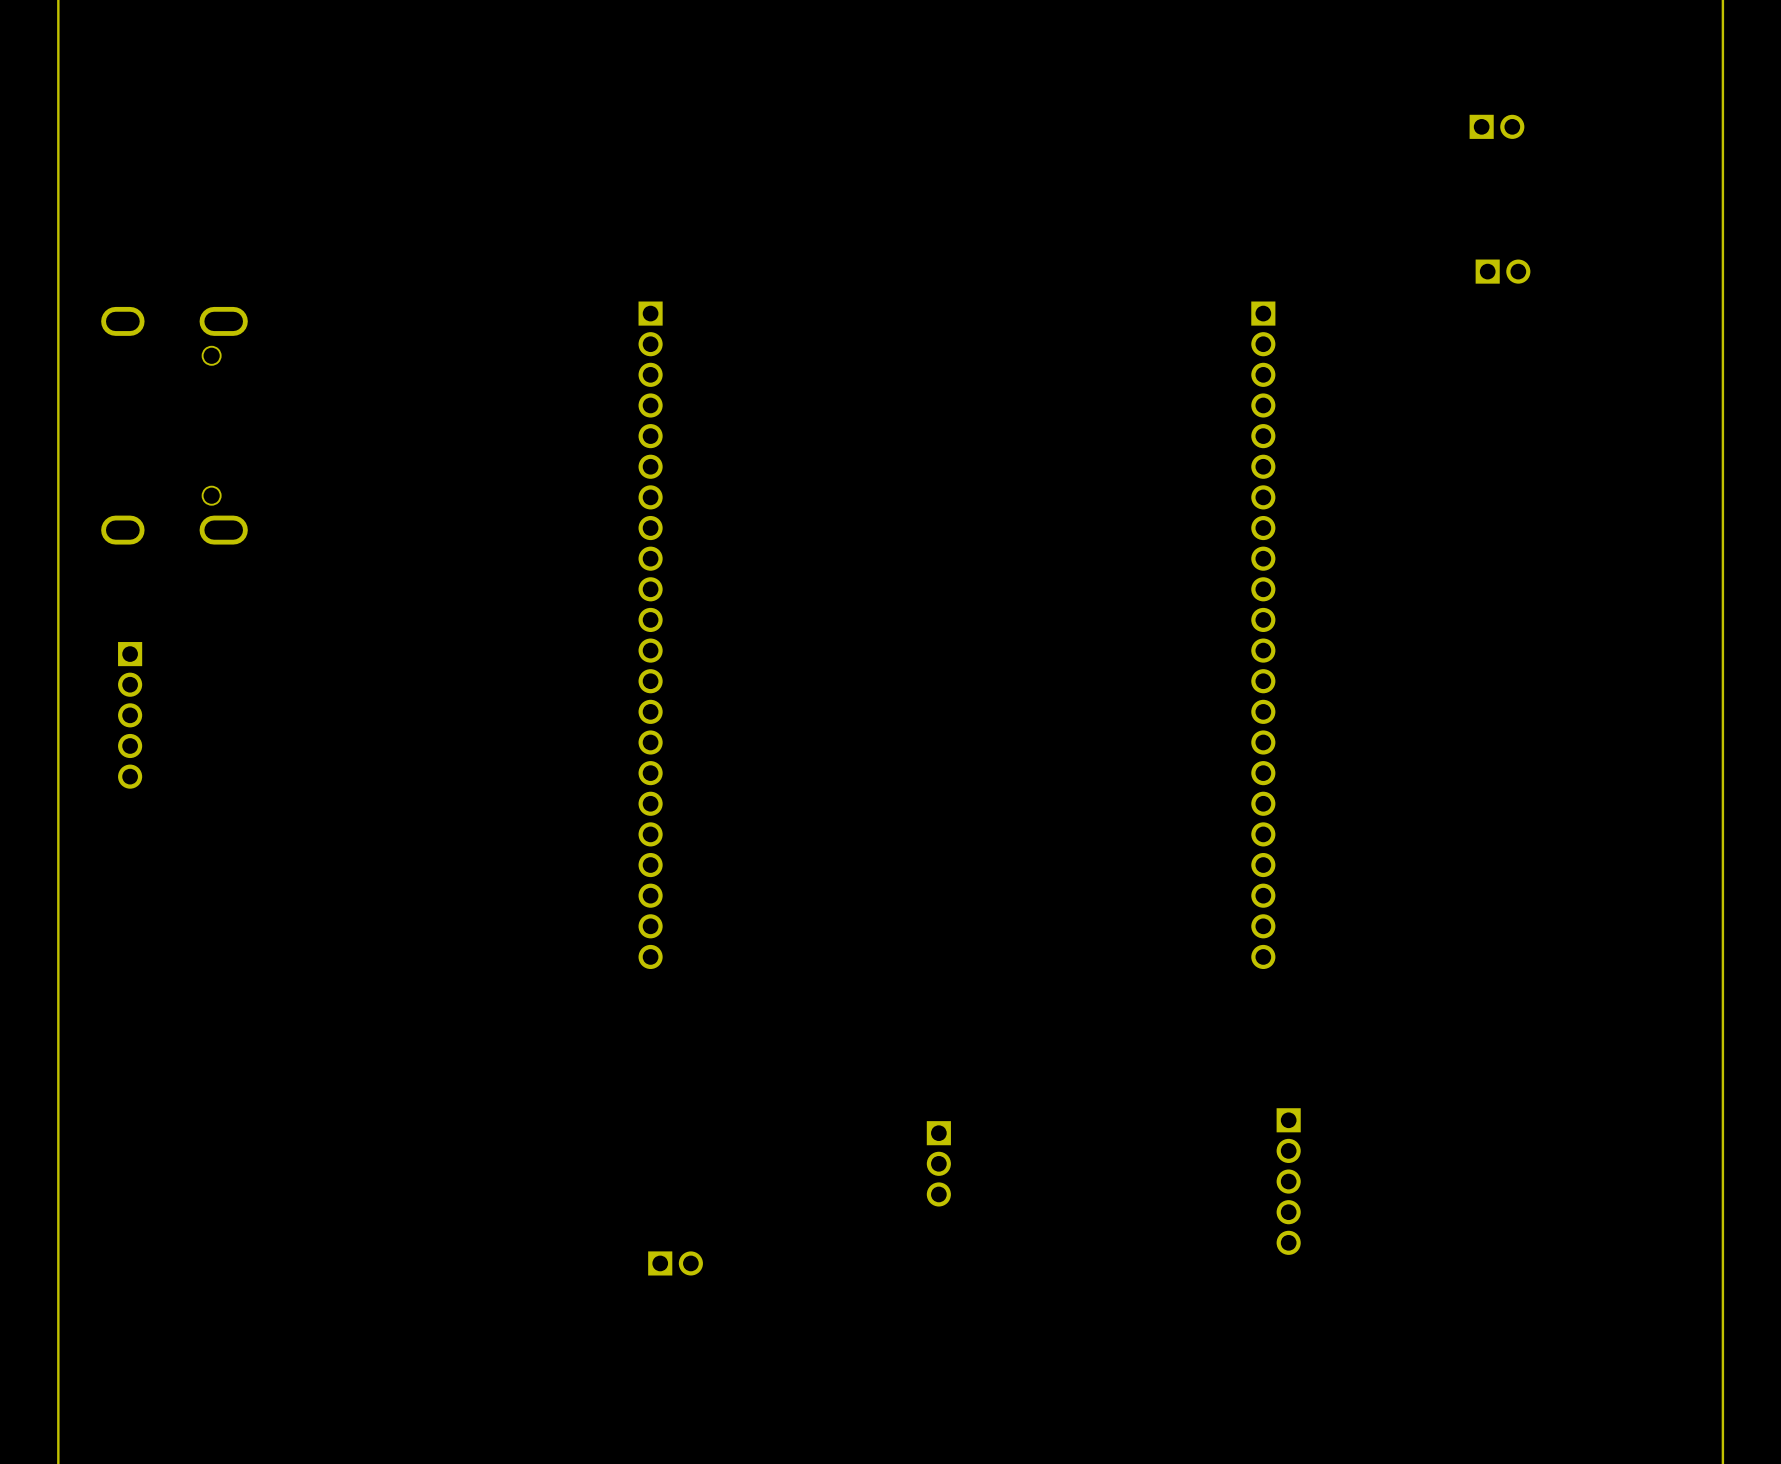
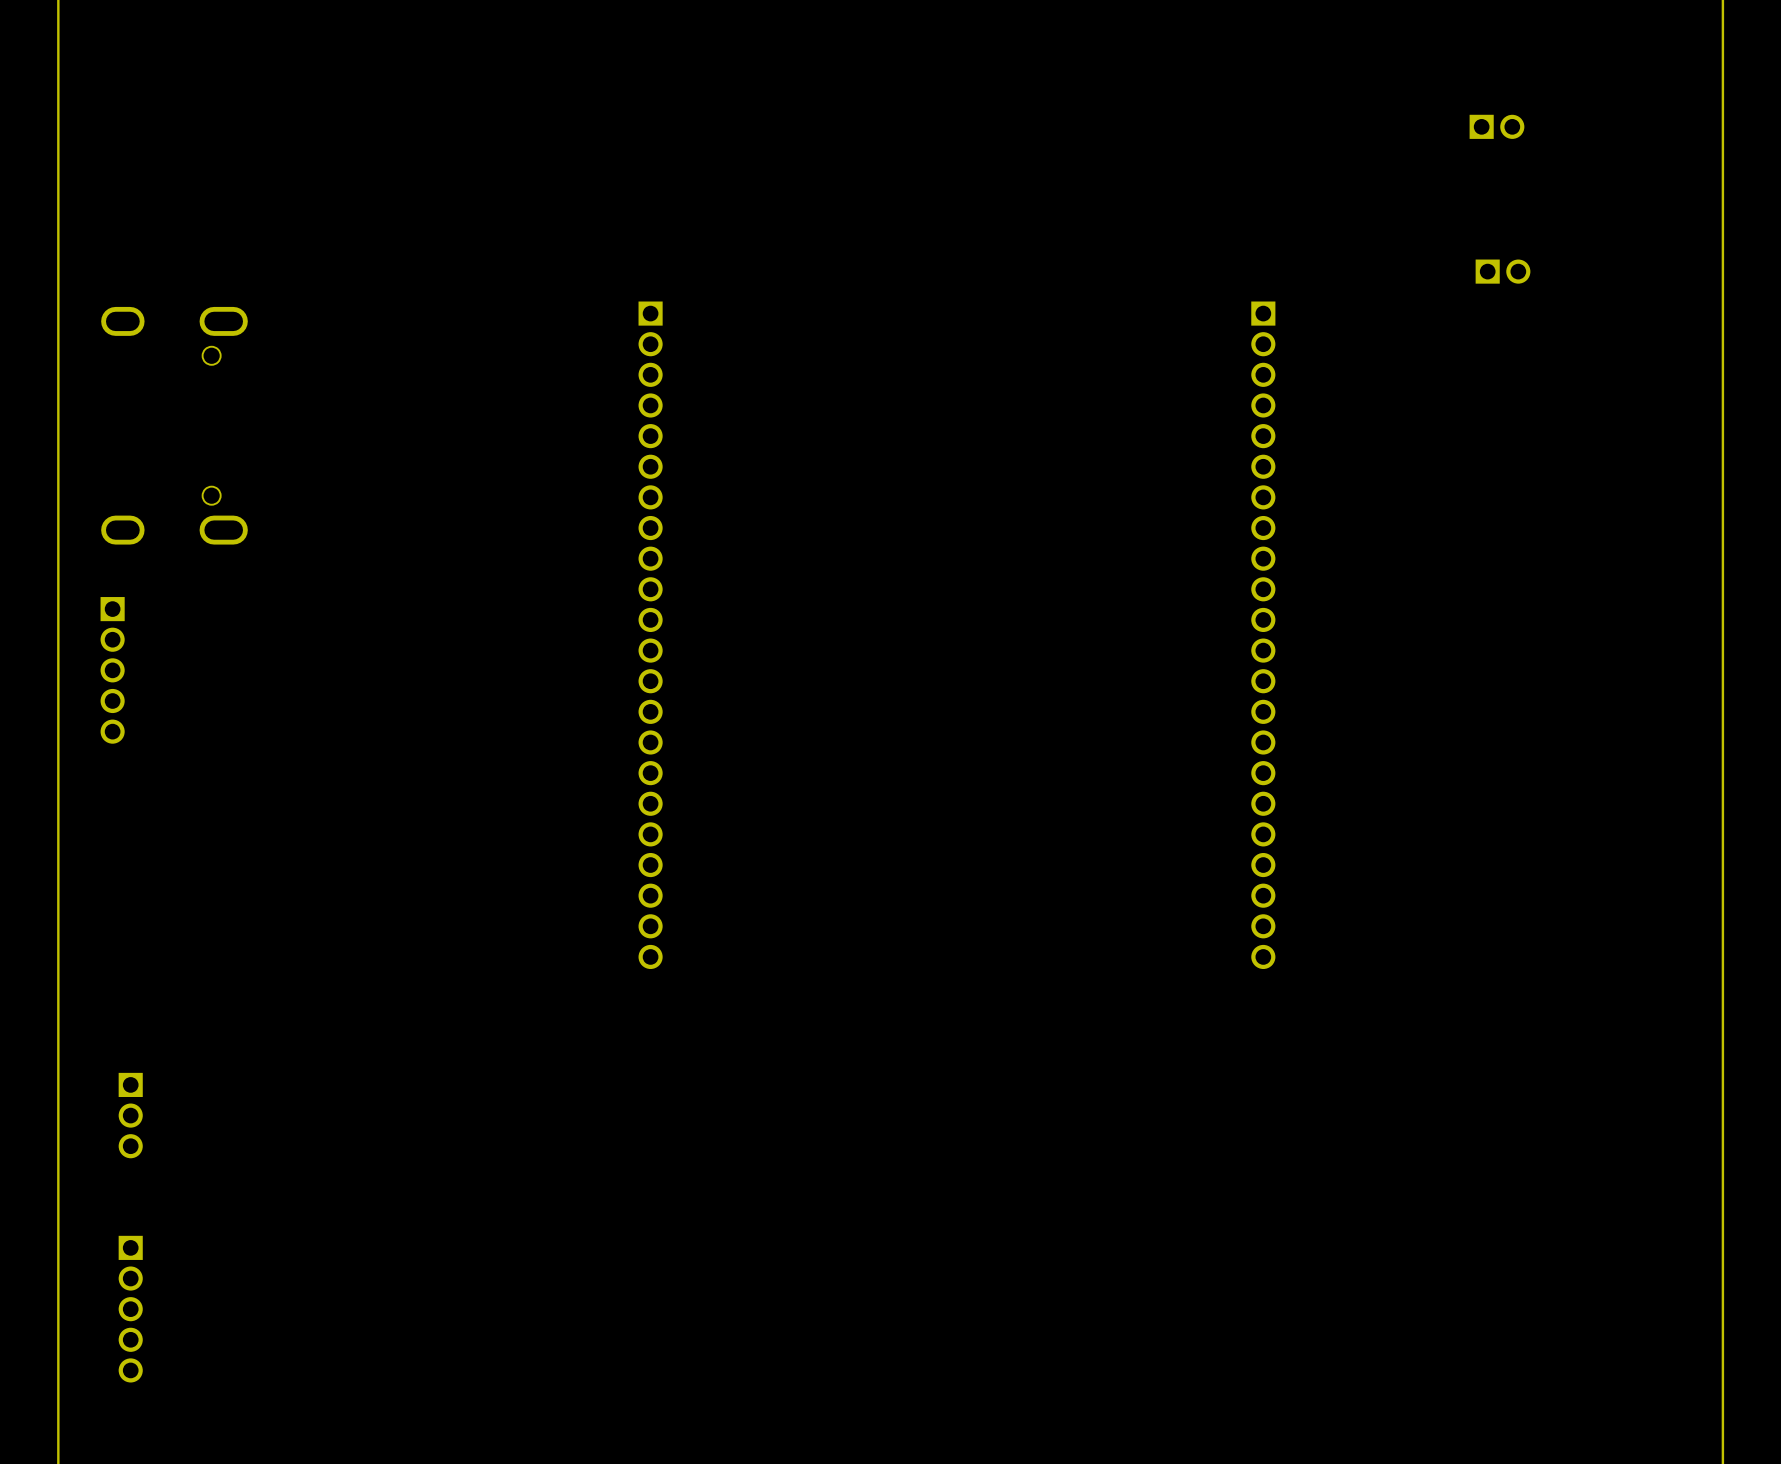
part position: (130, 715) -> (112, 670)
part: none -> (130, 1115)
part: (938, 1163) -> none
part: (1288, 1181) -> none
part: (675, 1263) -> none
part: none -> (130, 1309)

